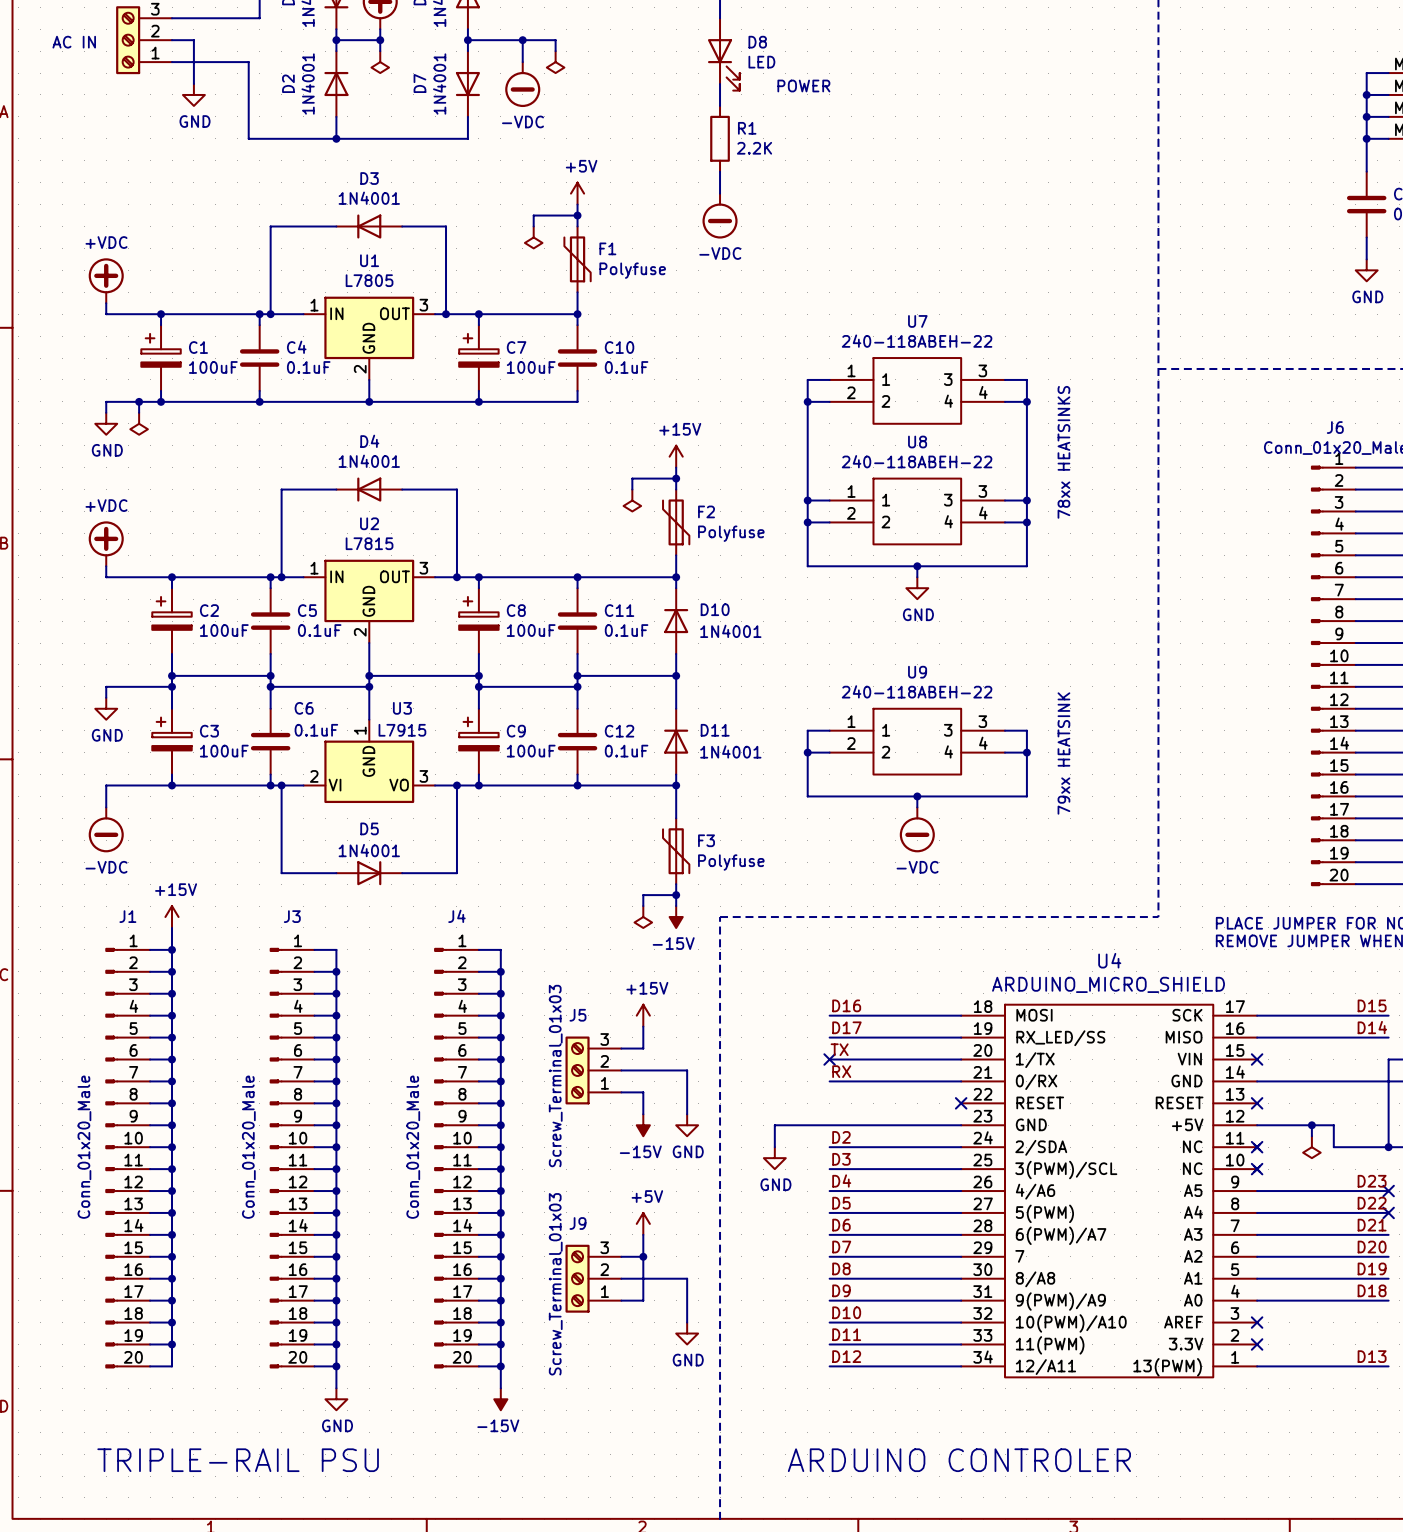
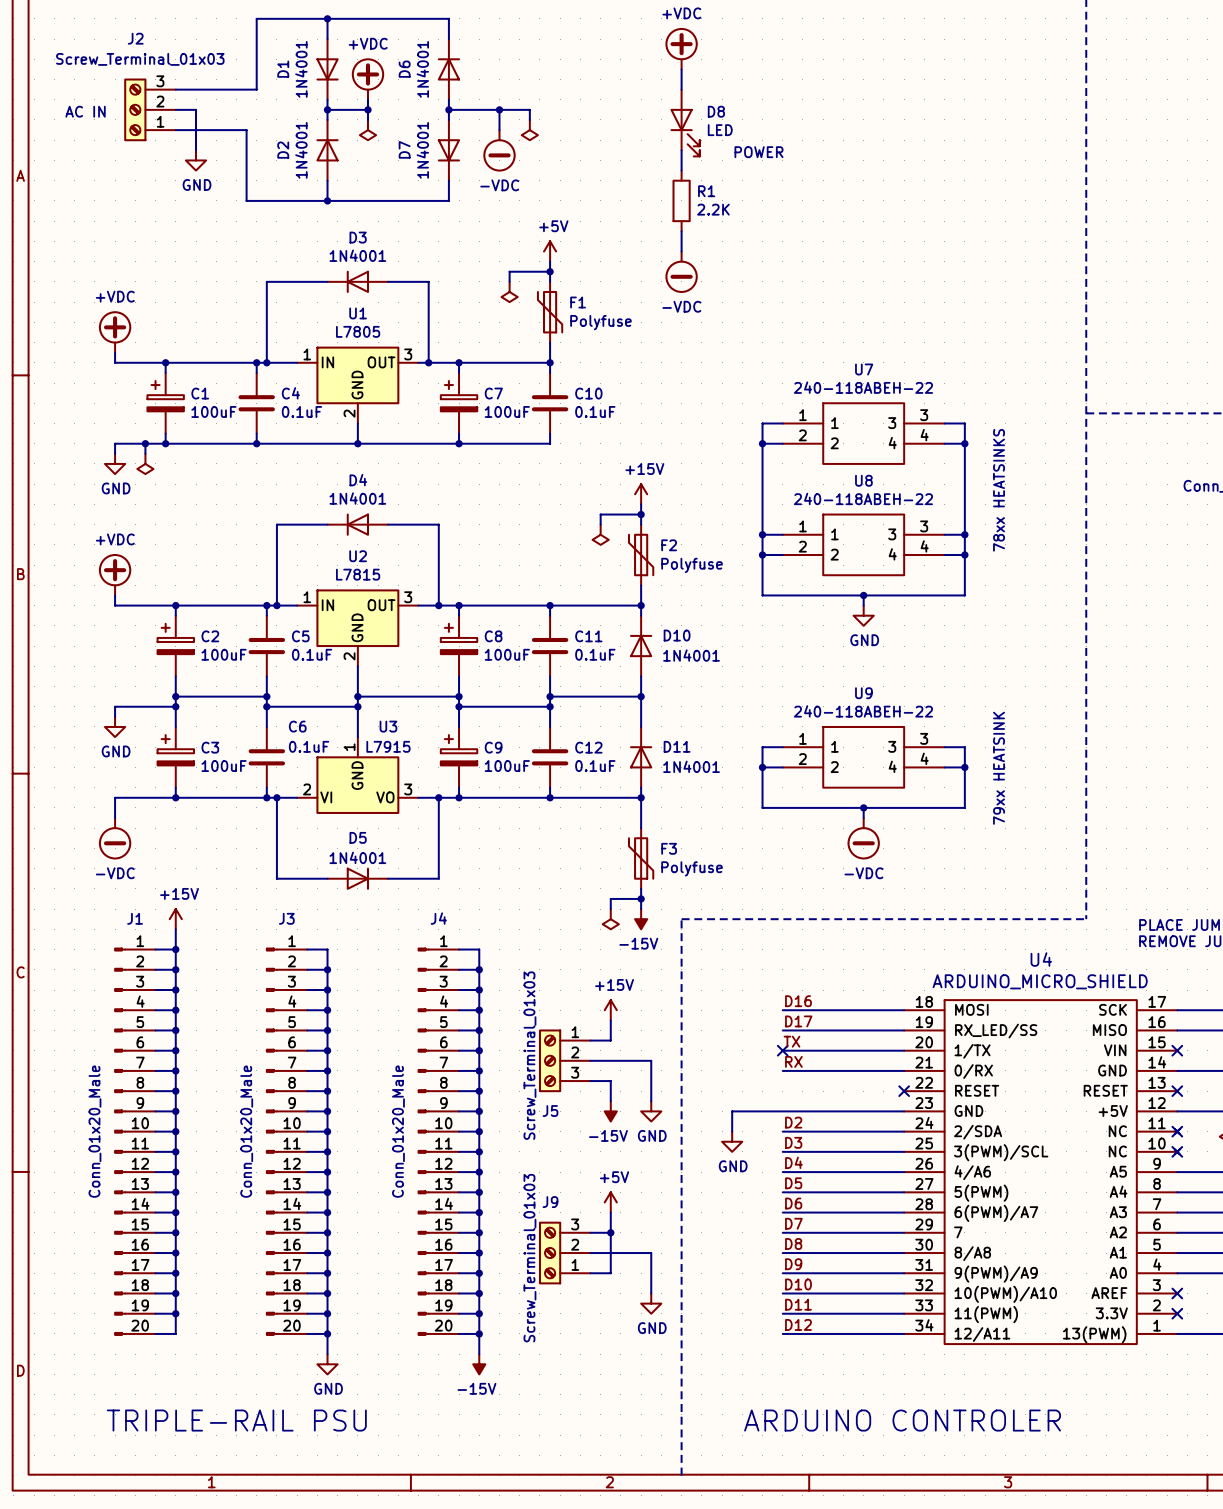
J5 flip: as is (577, 1070) -> up-down (550, 1060)

